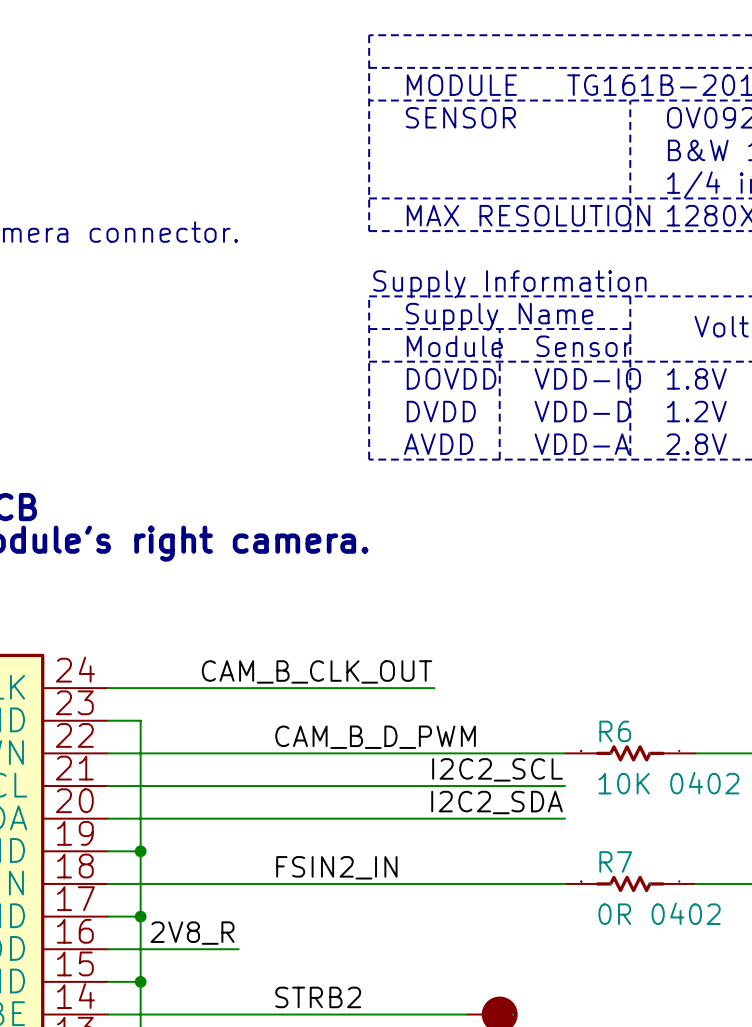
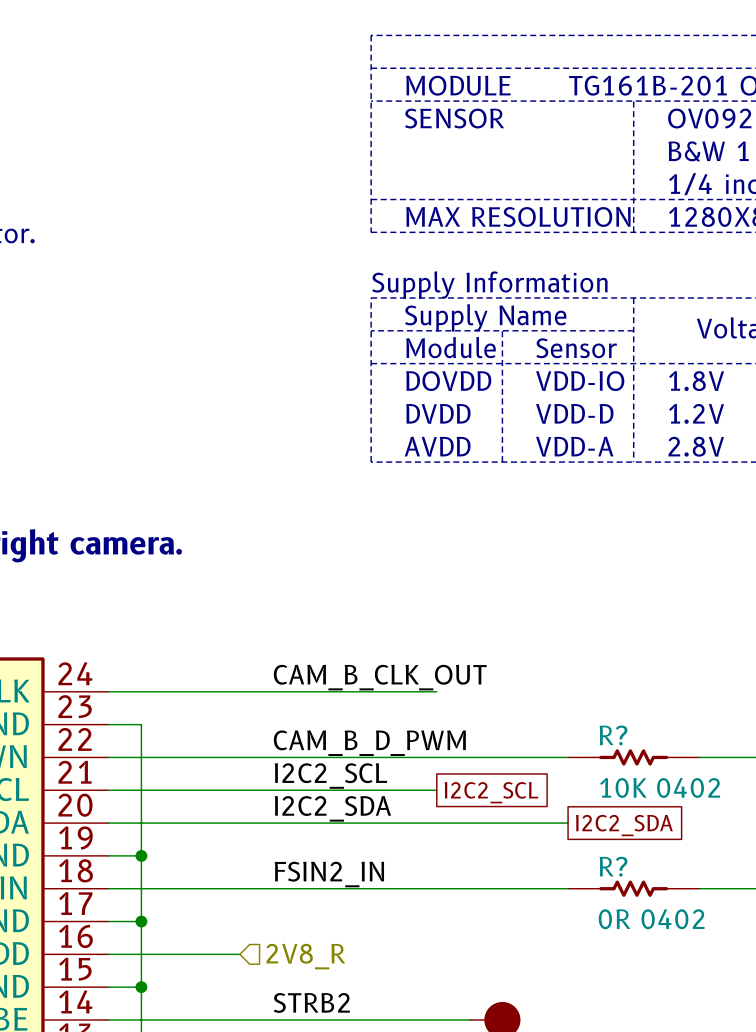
label position: CAM_B_CLK_OUT (317, 671) -> CAM_B_CLK_OUT (380, 677)
R6 name: R6 (615, 731) -> R? (613, 735)
label position: I2C2_SCL (497, 769) -> I2C2_SCL (330, 776)
wire: (434, 786) (565, 786) -> none
global label: none -> I2C2_SCL (491, 792)
label position: I2C2_SDA (497, 802) -> I2C2_SDA (332, 808)
global label: none -> I2C2_SDA (624, 825)
R7 name: R7 (615, 861) -> R? (613, 866)
label: 2V8_R (192, 933) -> none
hierarchical label: none -> 2V8_R (305, 956)

